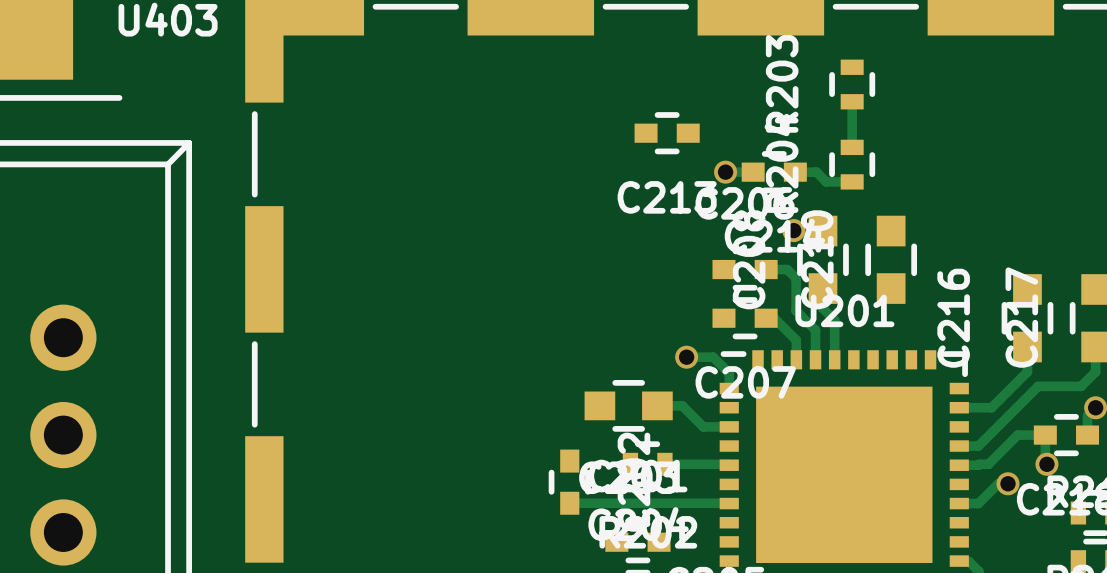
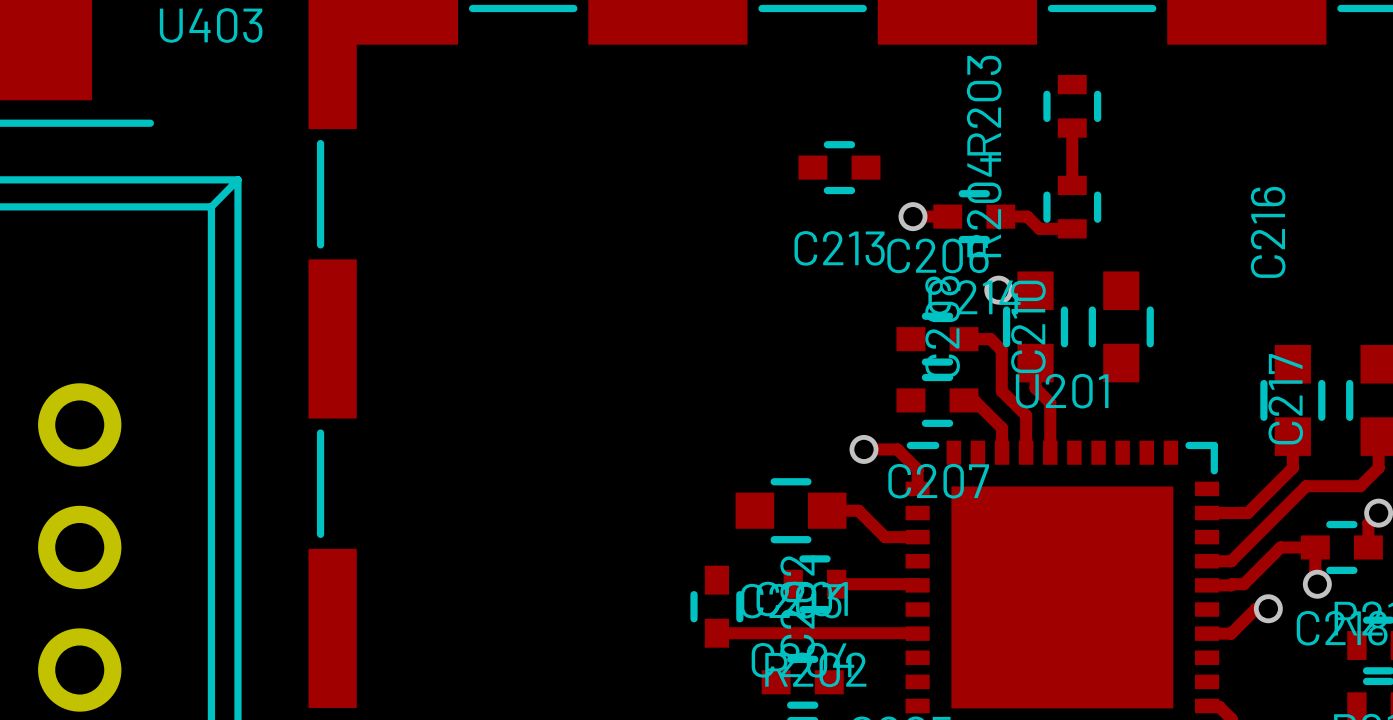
C216 name position: C216 (953, 318) -> C216 (1268, 232)

